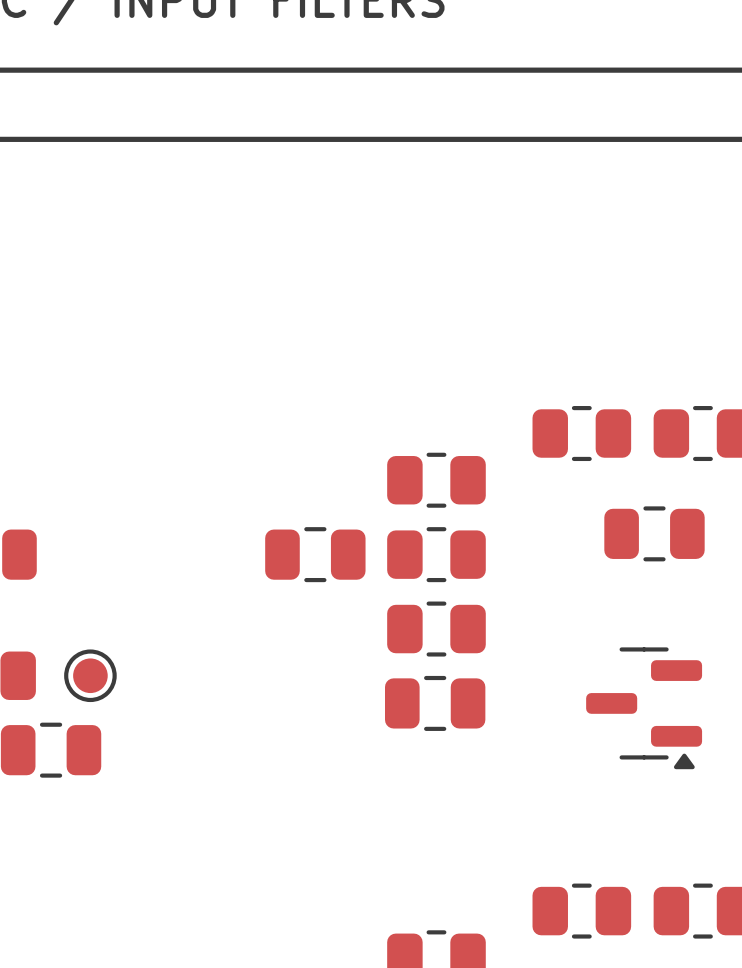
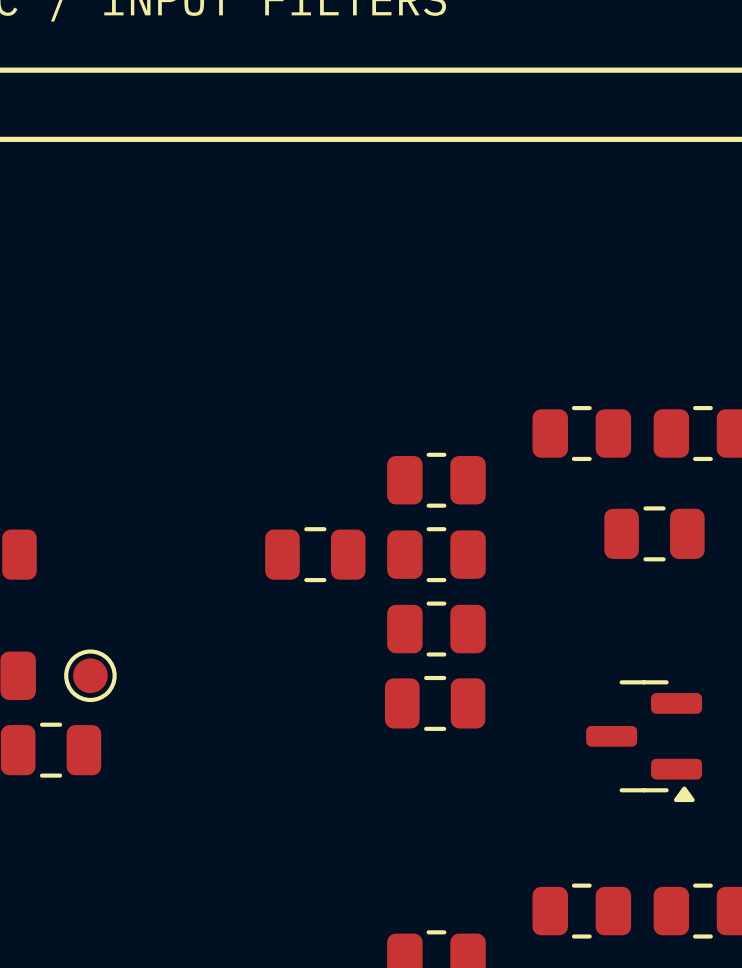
part position: (644, 708) -> (644, 741)

